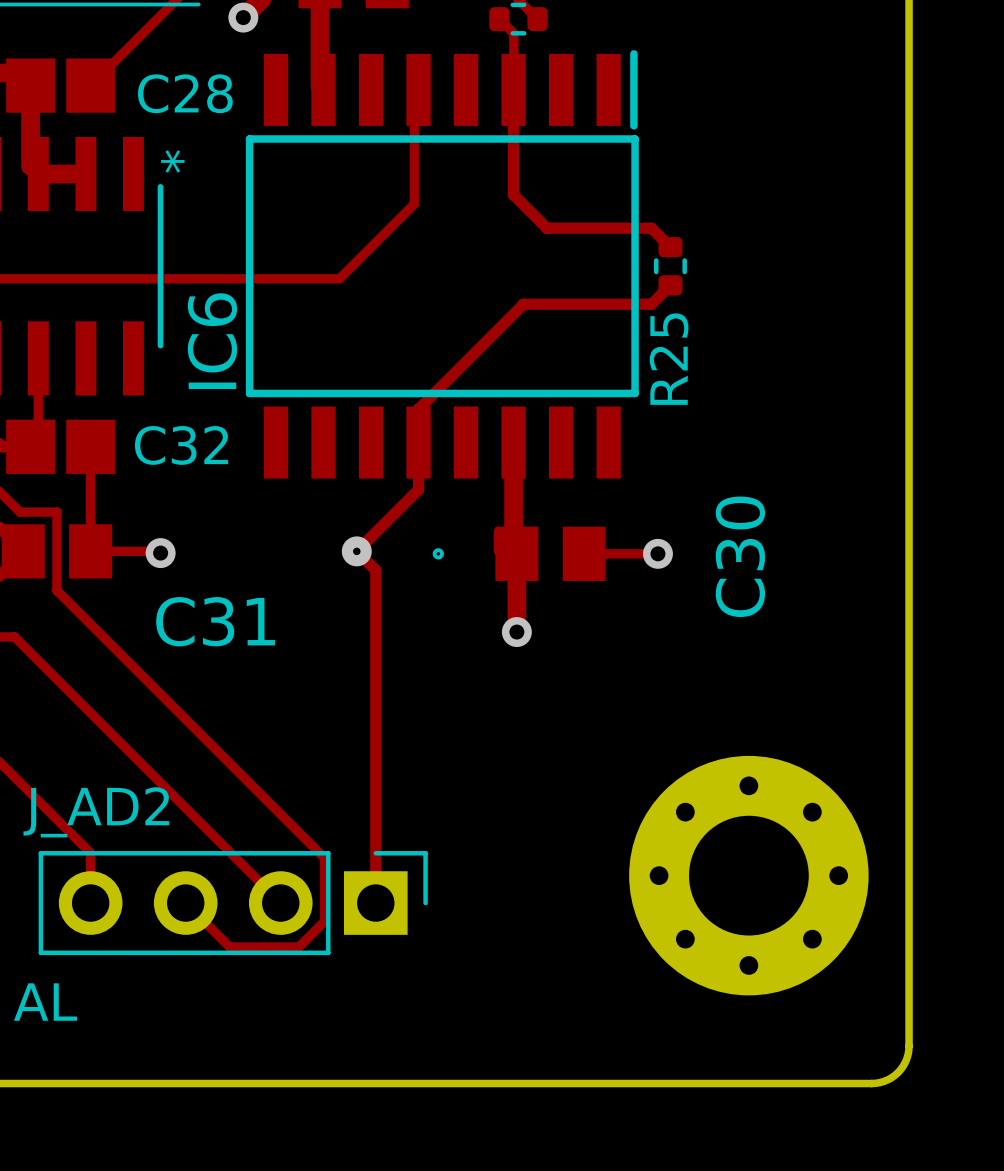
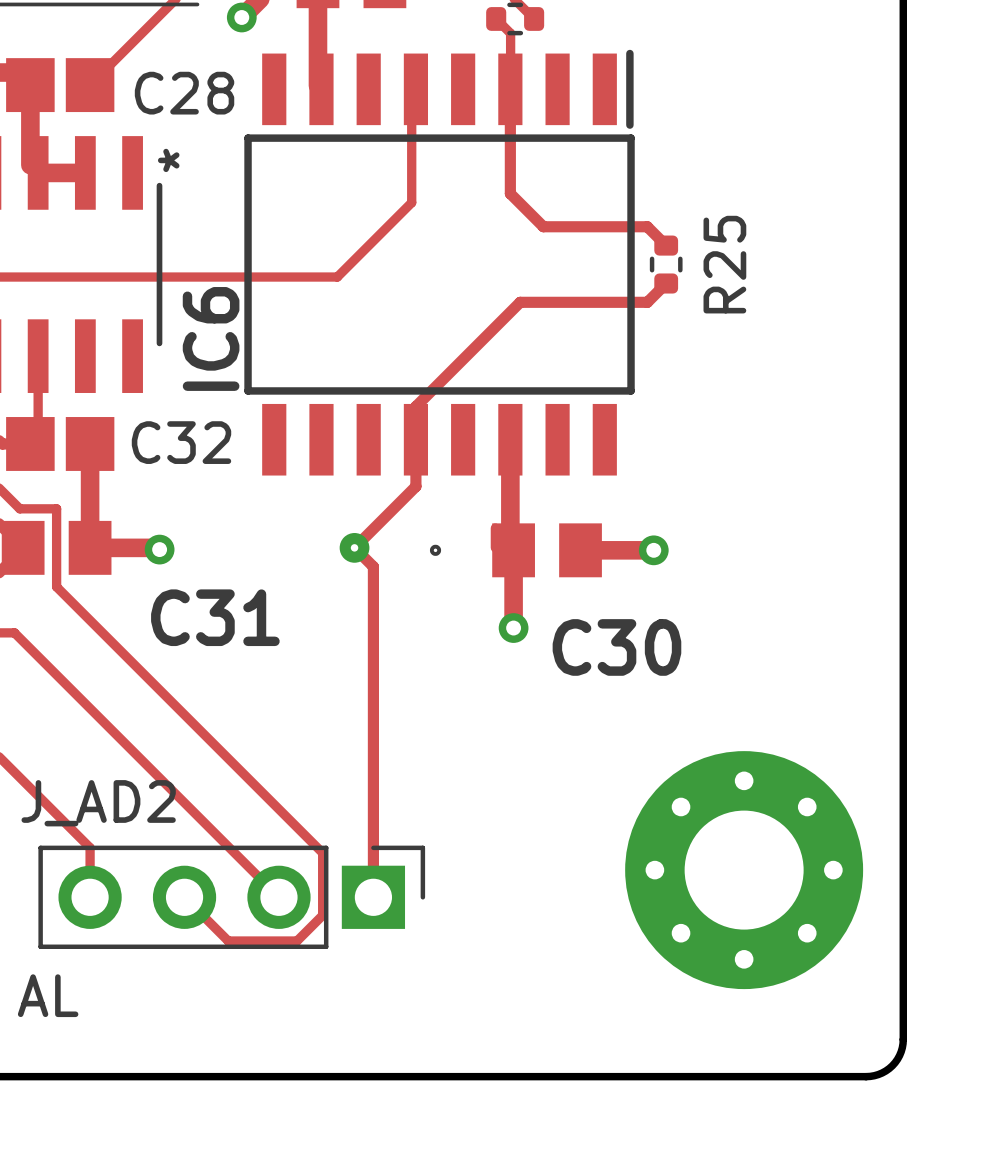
R25 name position: R25 (669, 359) -> R25 (724, 264)
track width: thin (90, 446) (90, 551) (158, 551) -> thick (90, 443) (90, 547) (157, 547)
track width: thin (584, 553) (657, 553) -> thick (580, 550) (653, 550)
C30 name rotation: 0° (740, 556) -> 90° clockwise (616, 647)

